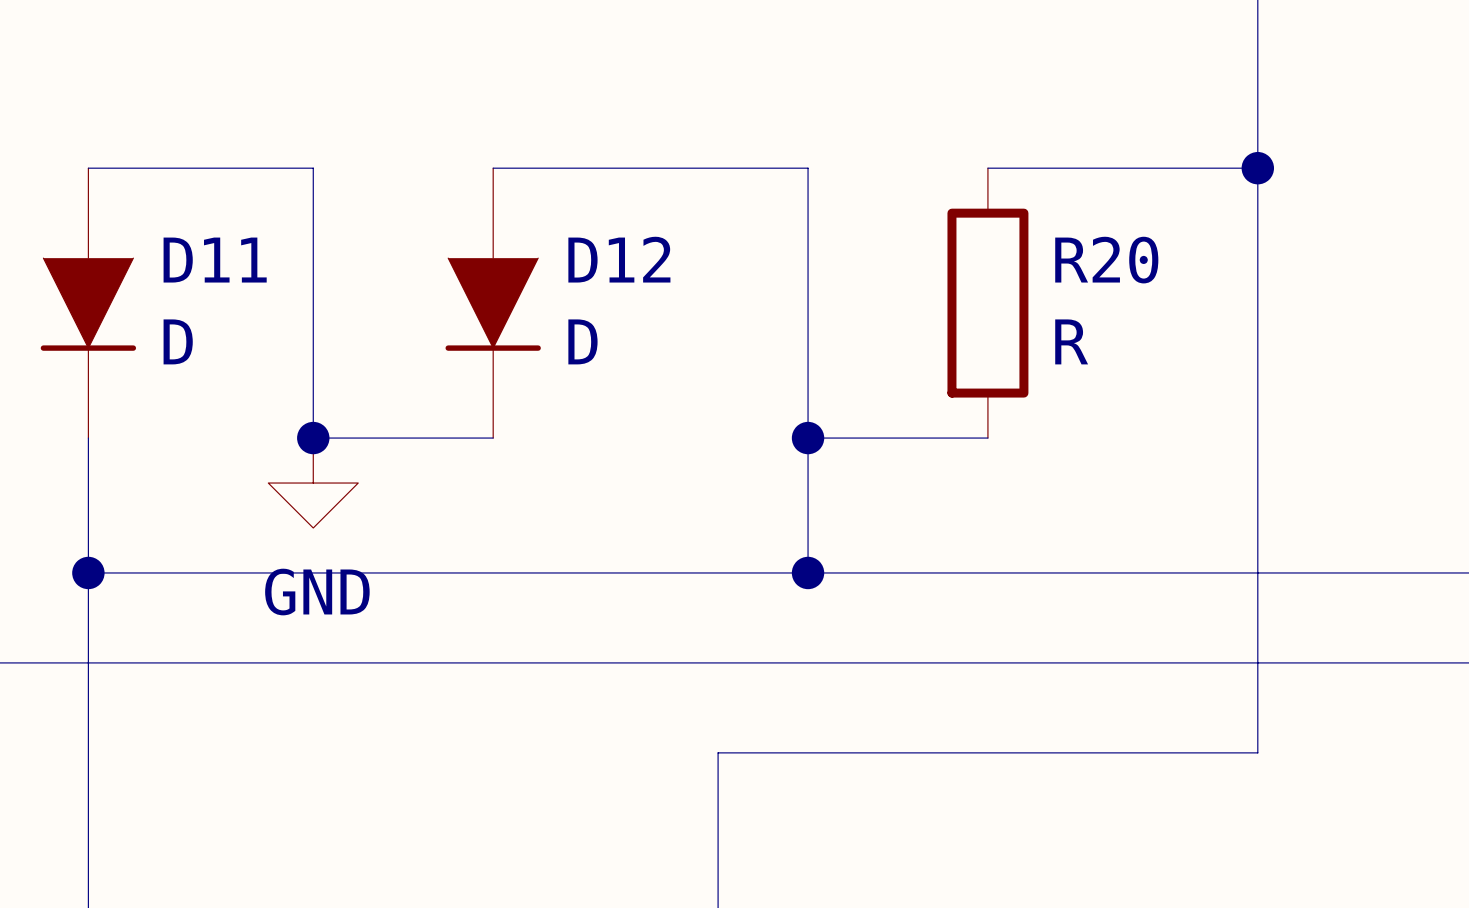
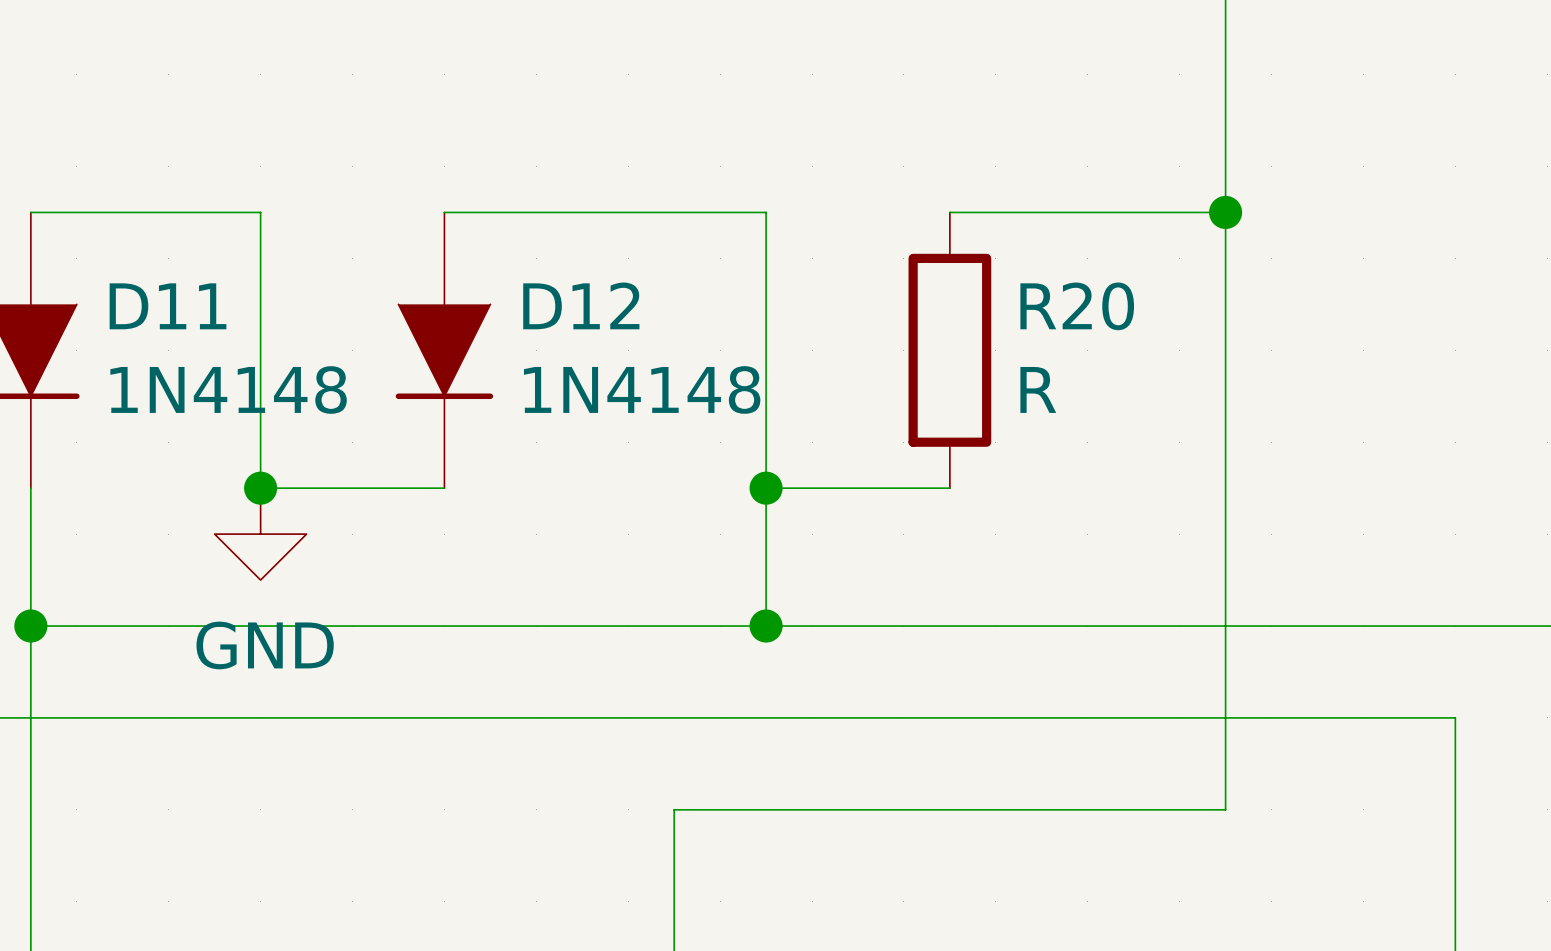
D11 value: D (178, 341) -> 1N4148 (228, 389)
D12 value: D (582, 341) -> 1N4148 (642, 389)

